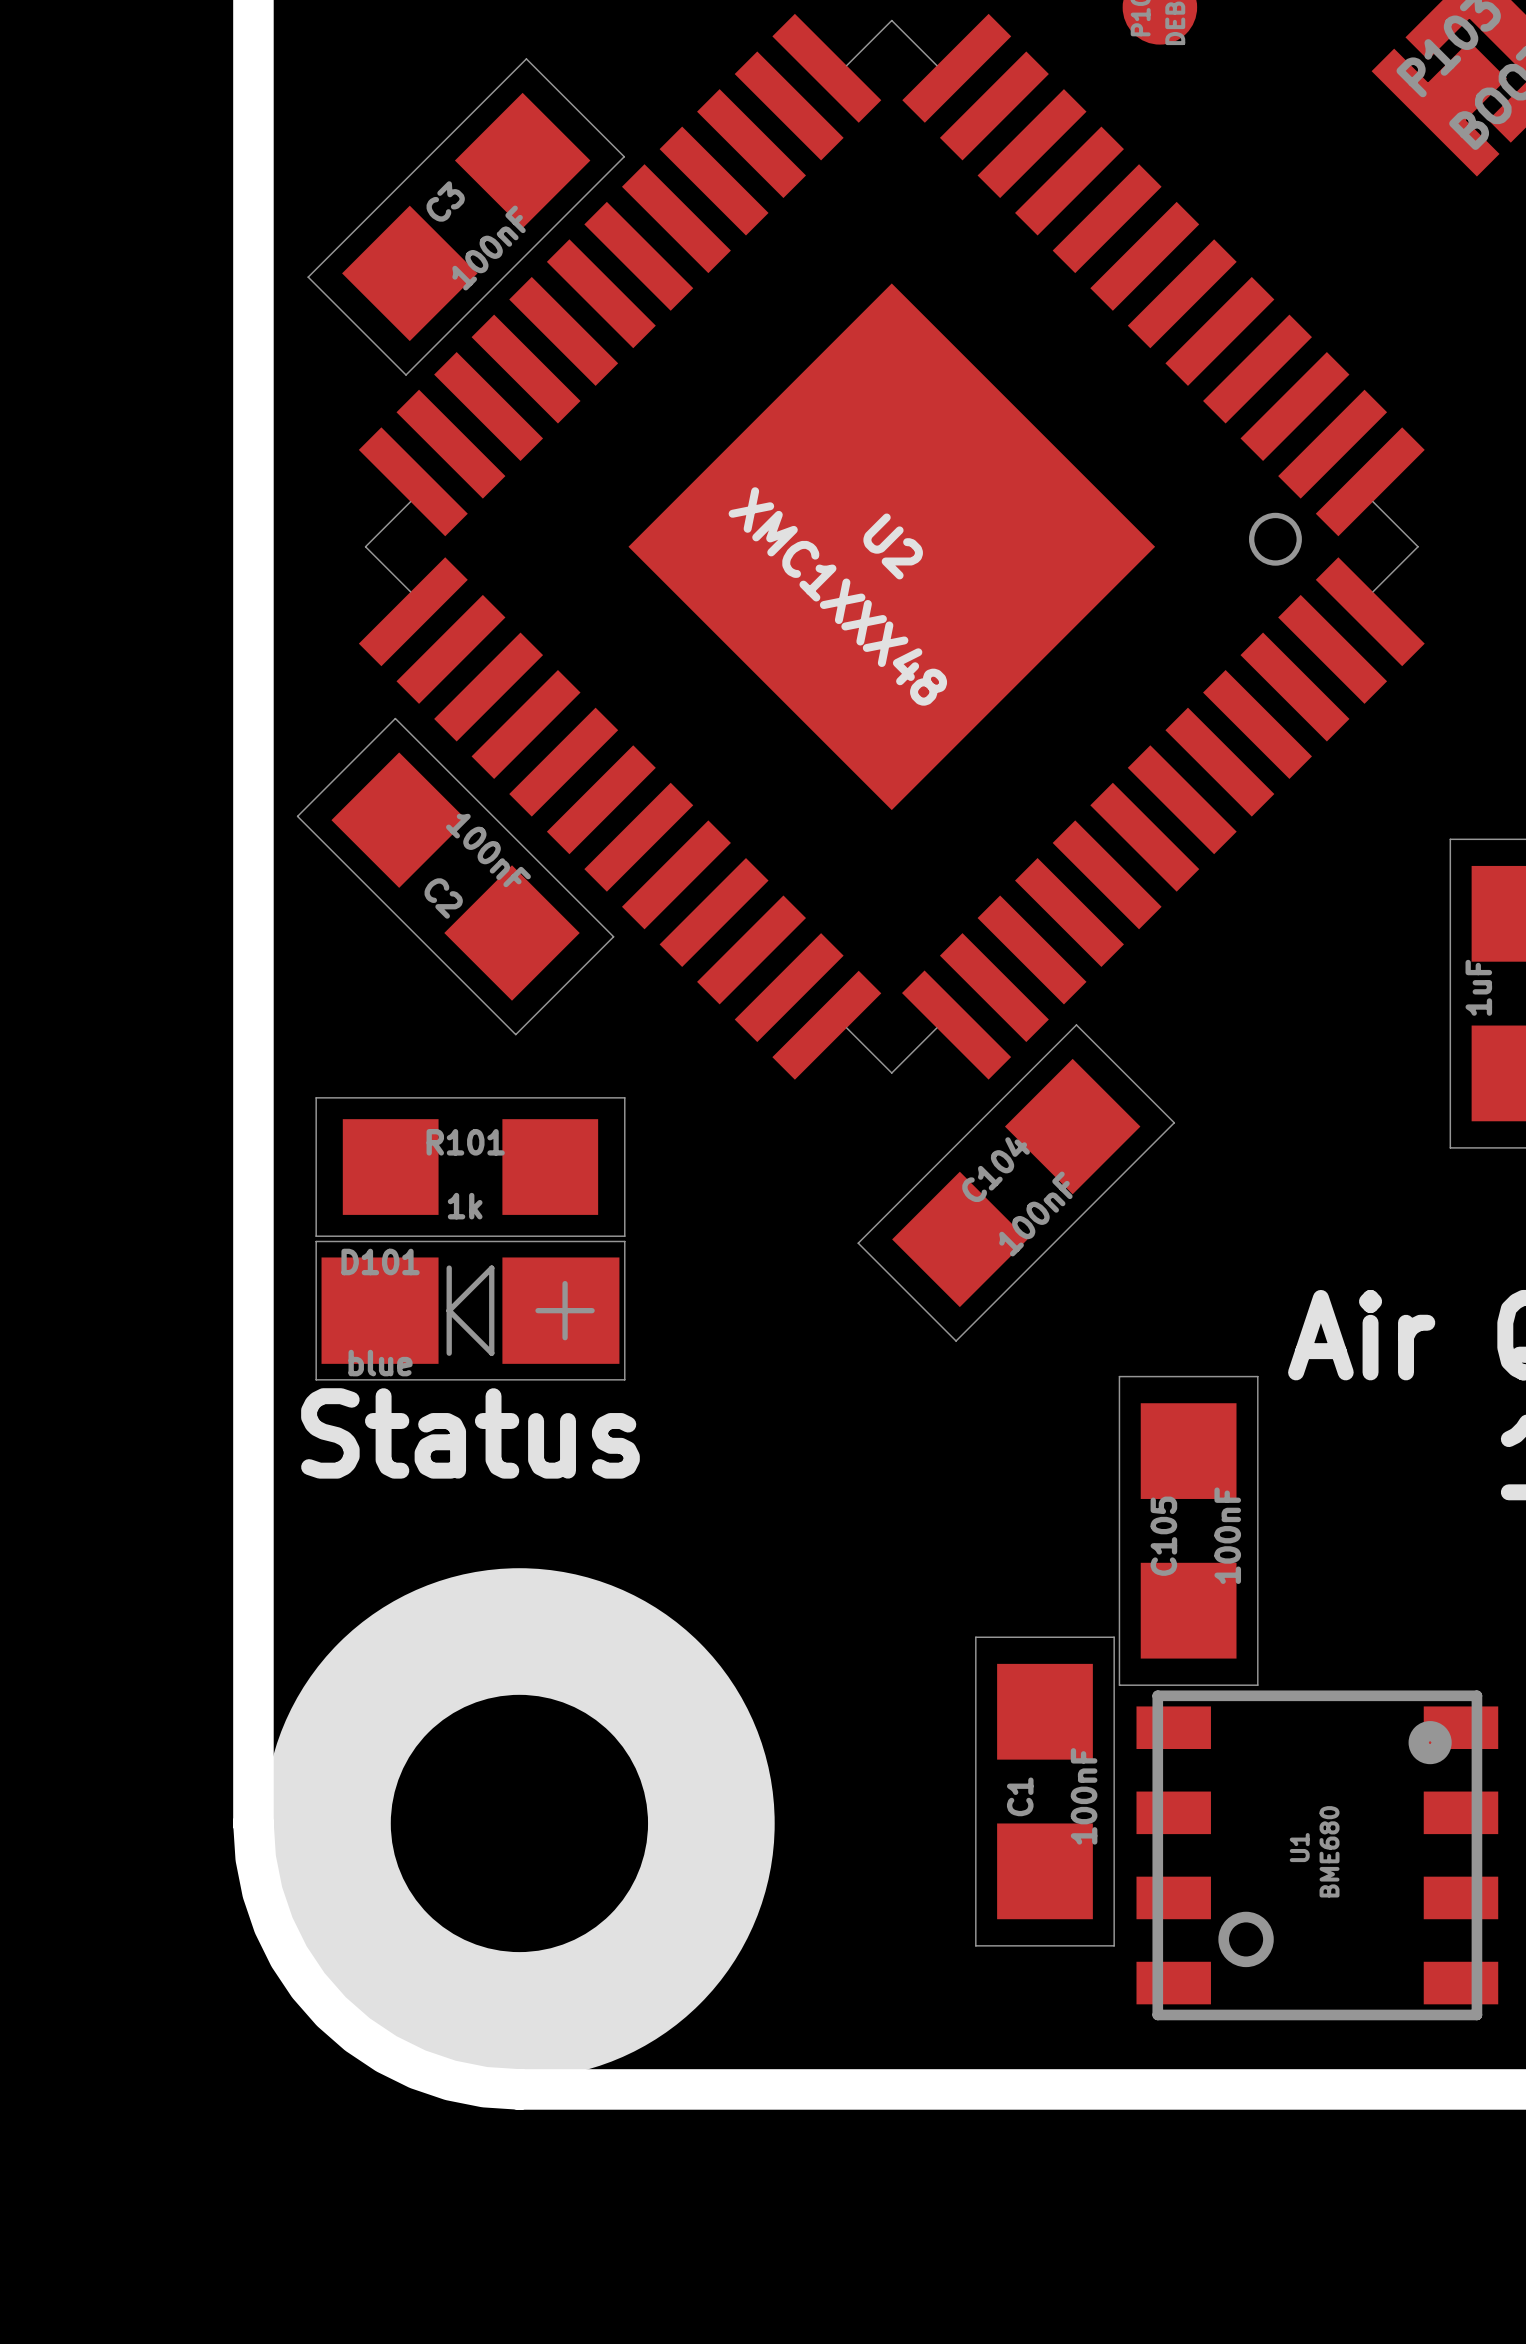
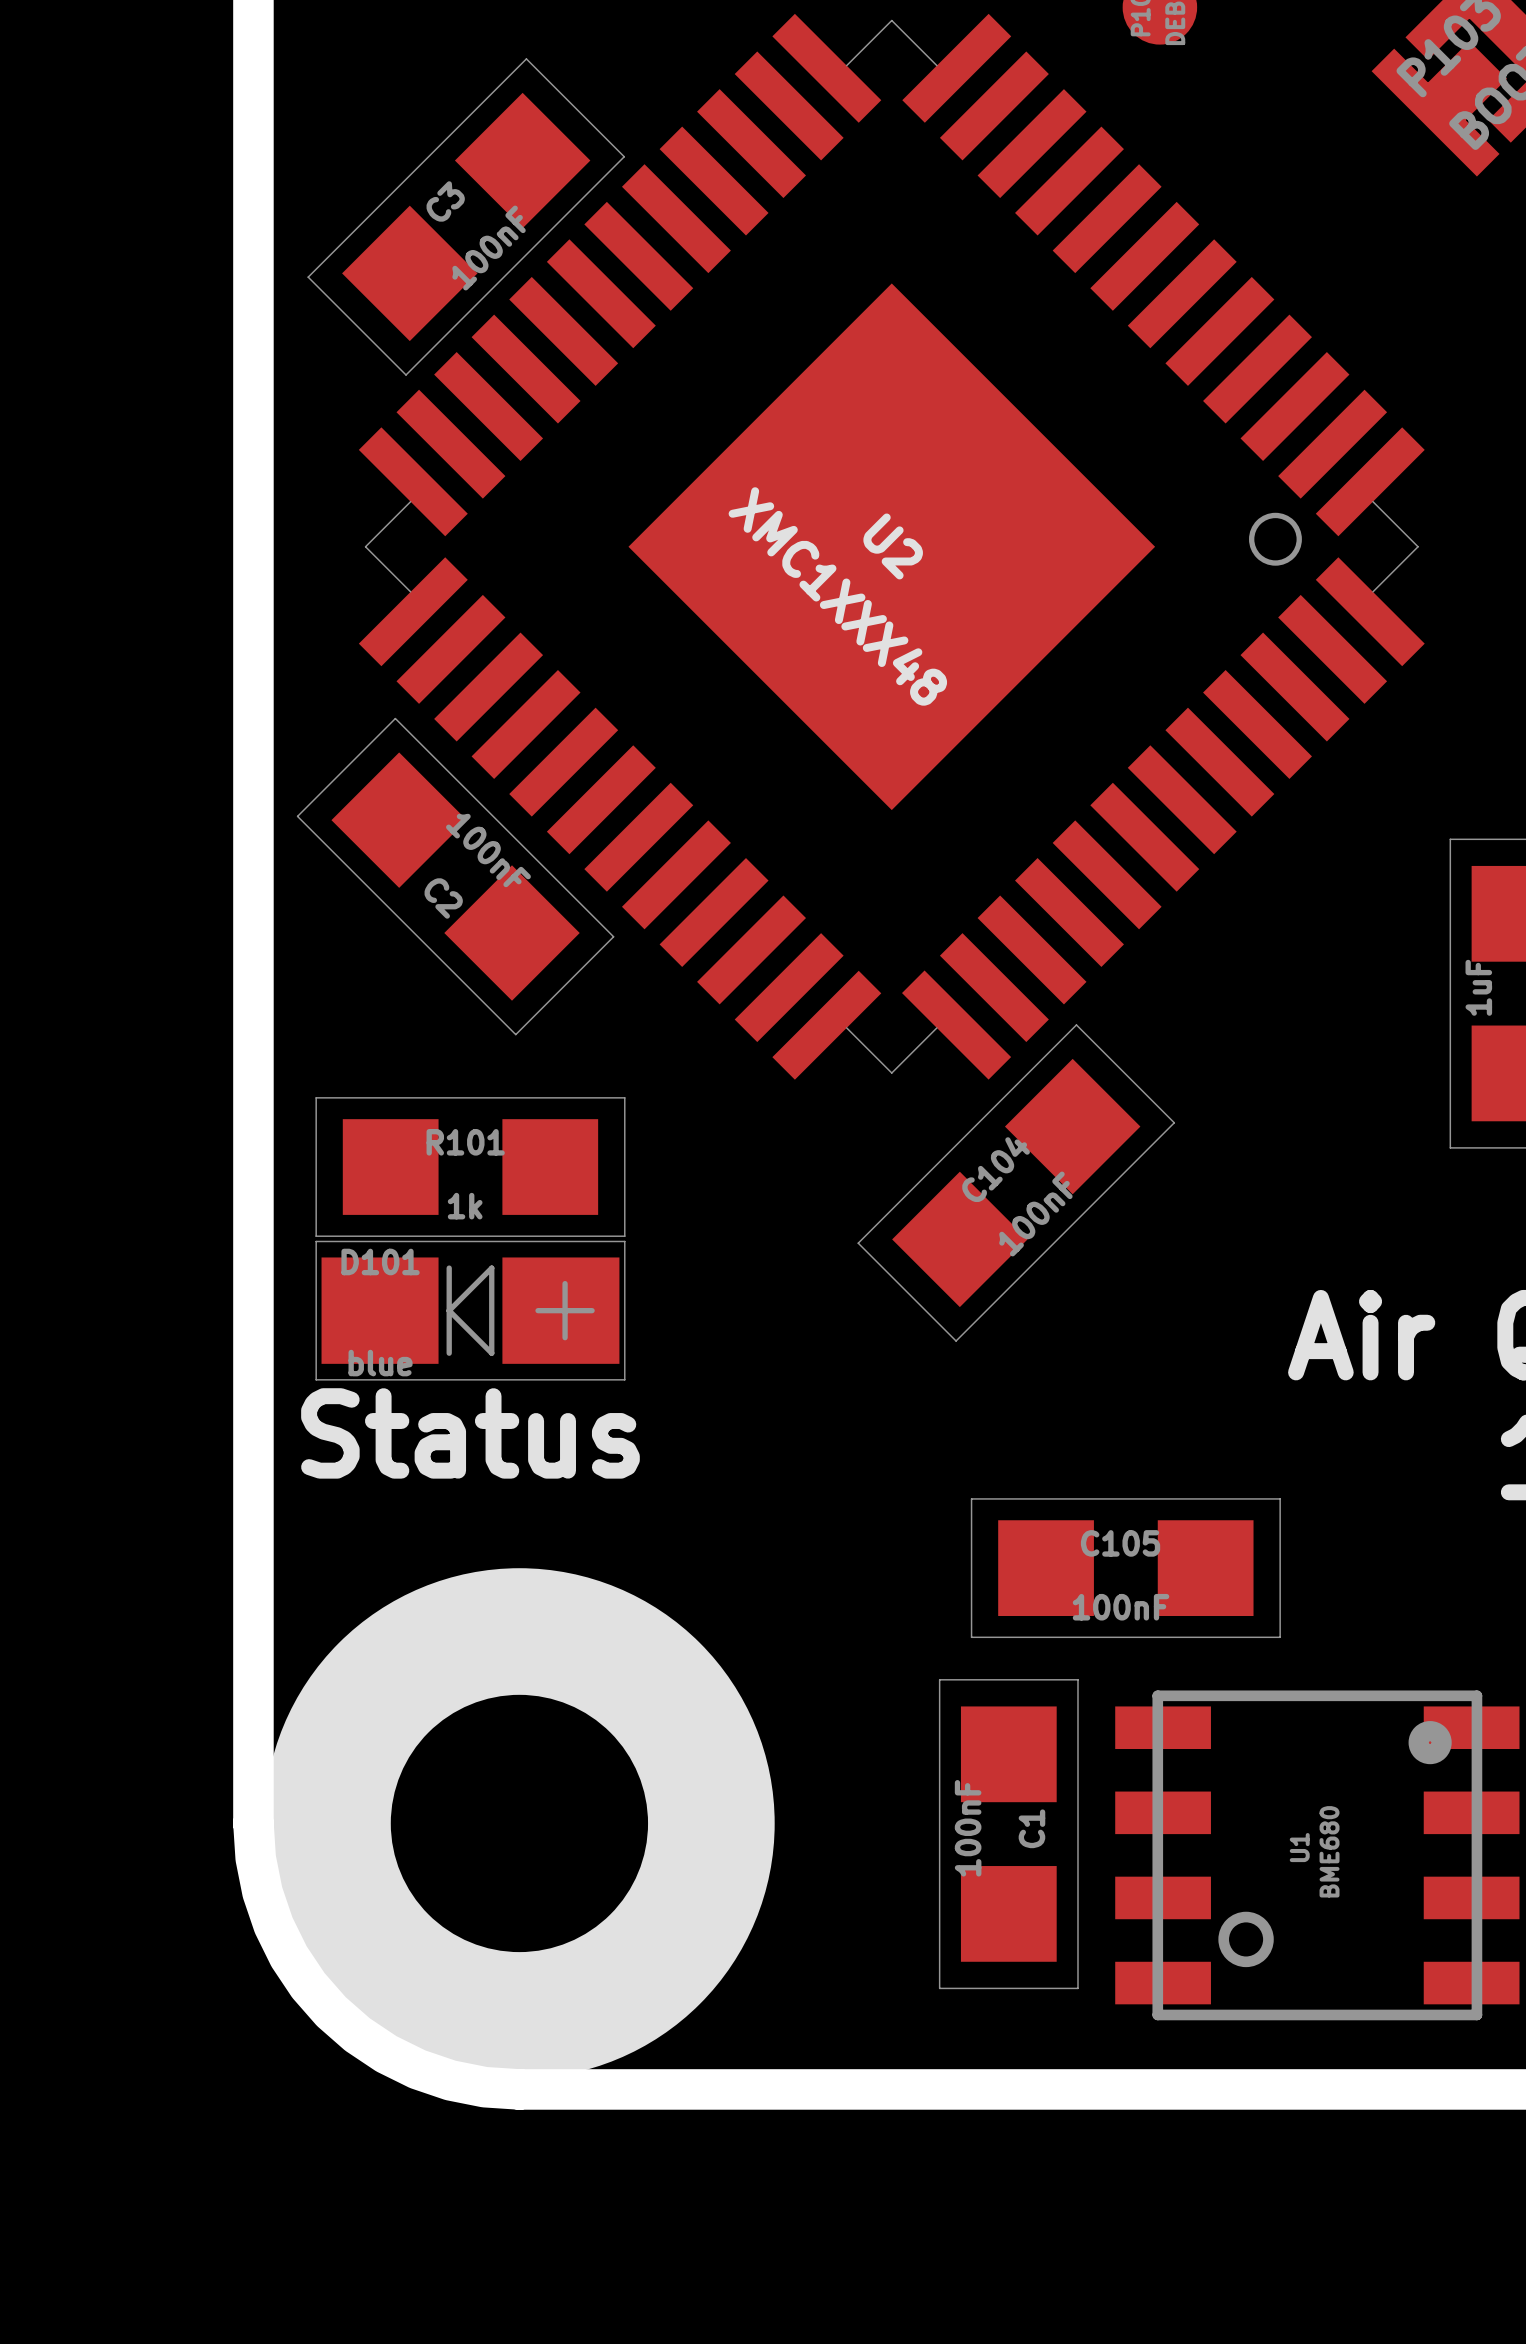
C105 rotation: 0° (1188, 1530) -> 90° clockwise (1125, 1568)
U1 footprint: [1136, 1690, 1499, 2021] -> [1115, 1690, 1520, 2021]
C1 position: (1044, 1791) -> (1008, 1834)
C1 name position: C1 (1020, 1796) -> C1 (1031, 1828)
C1 value position: 100nF (1084, 1796) -> 100nF (968, 1828)

